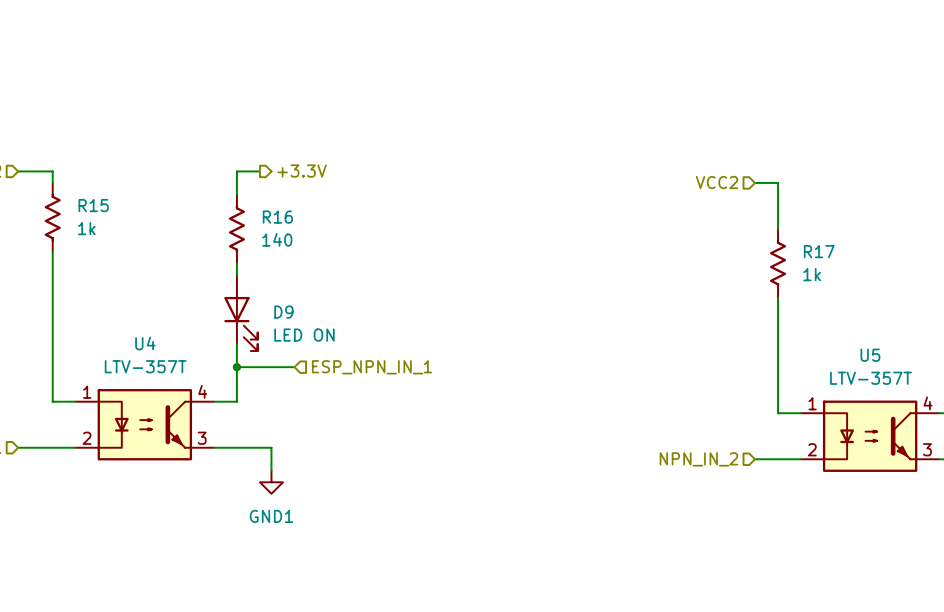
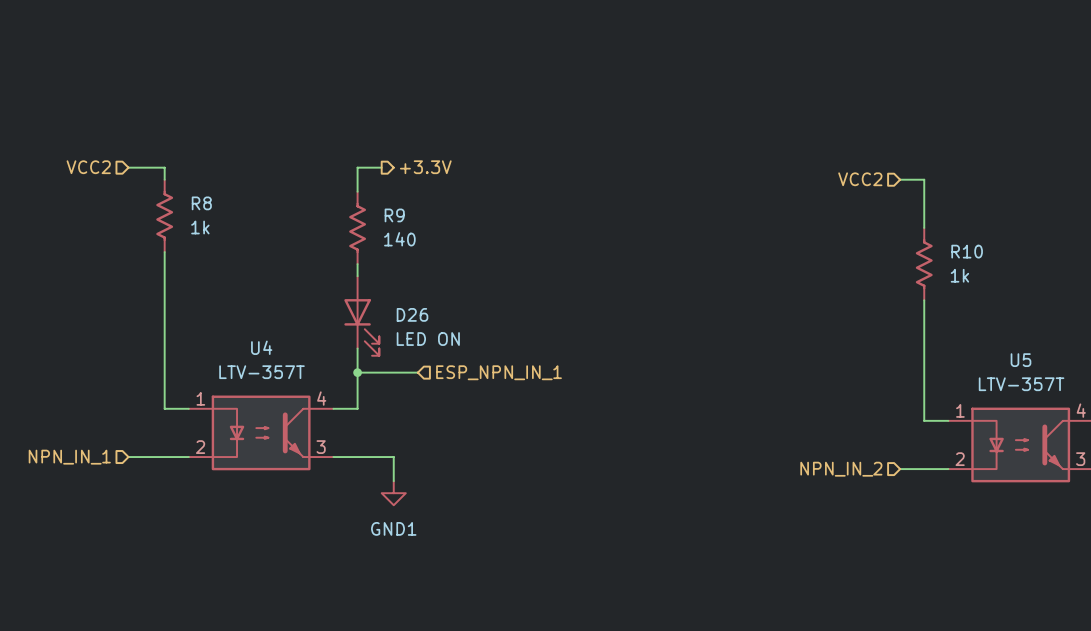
R15 name: R15 (93, 205) -> R8 (201, 203)
R16 name: R16 (277, 217) -> R9 (394, 215)
R17 name: R17 (819, 251) -> R10 (967, 251)
D9 name: D9 (283, 312) -> D26 (412, 314)

